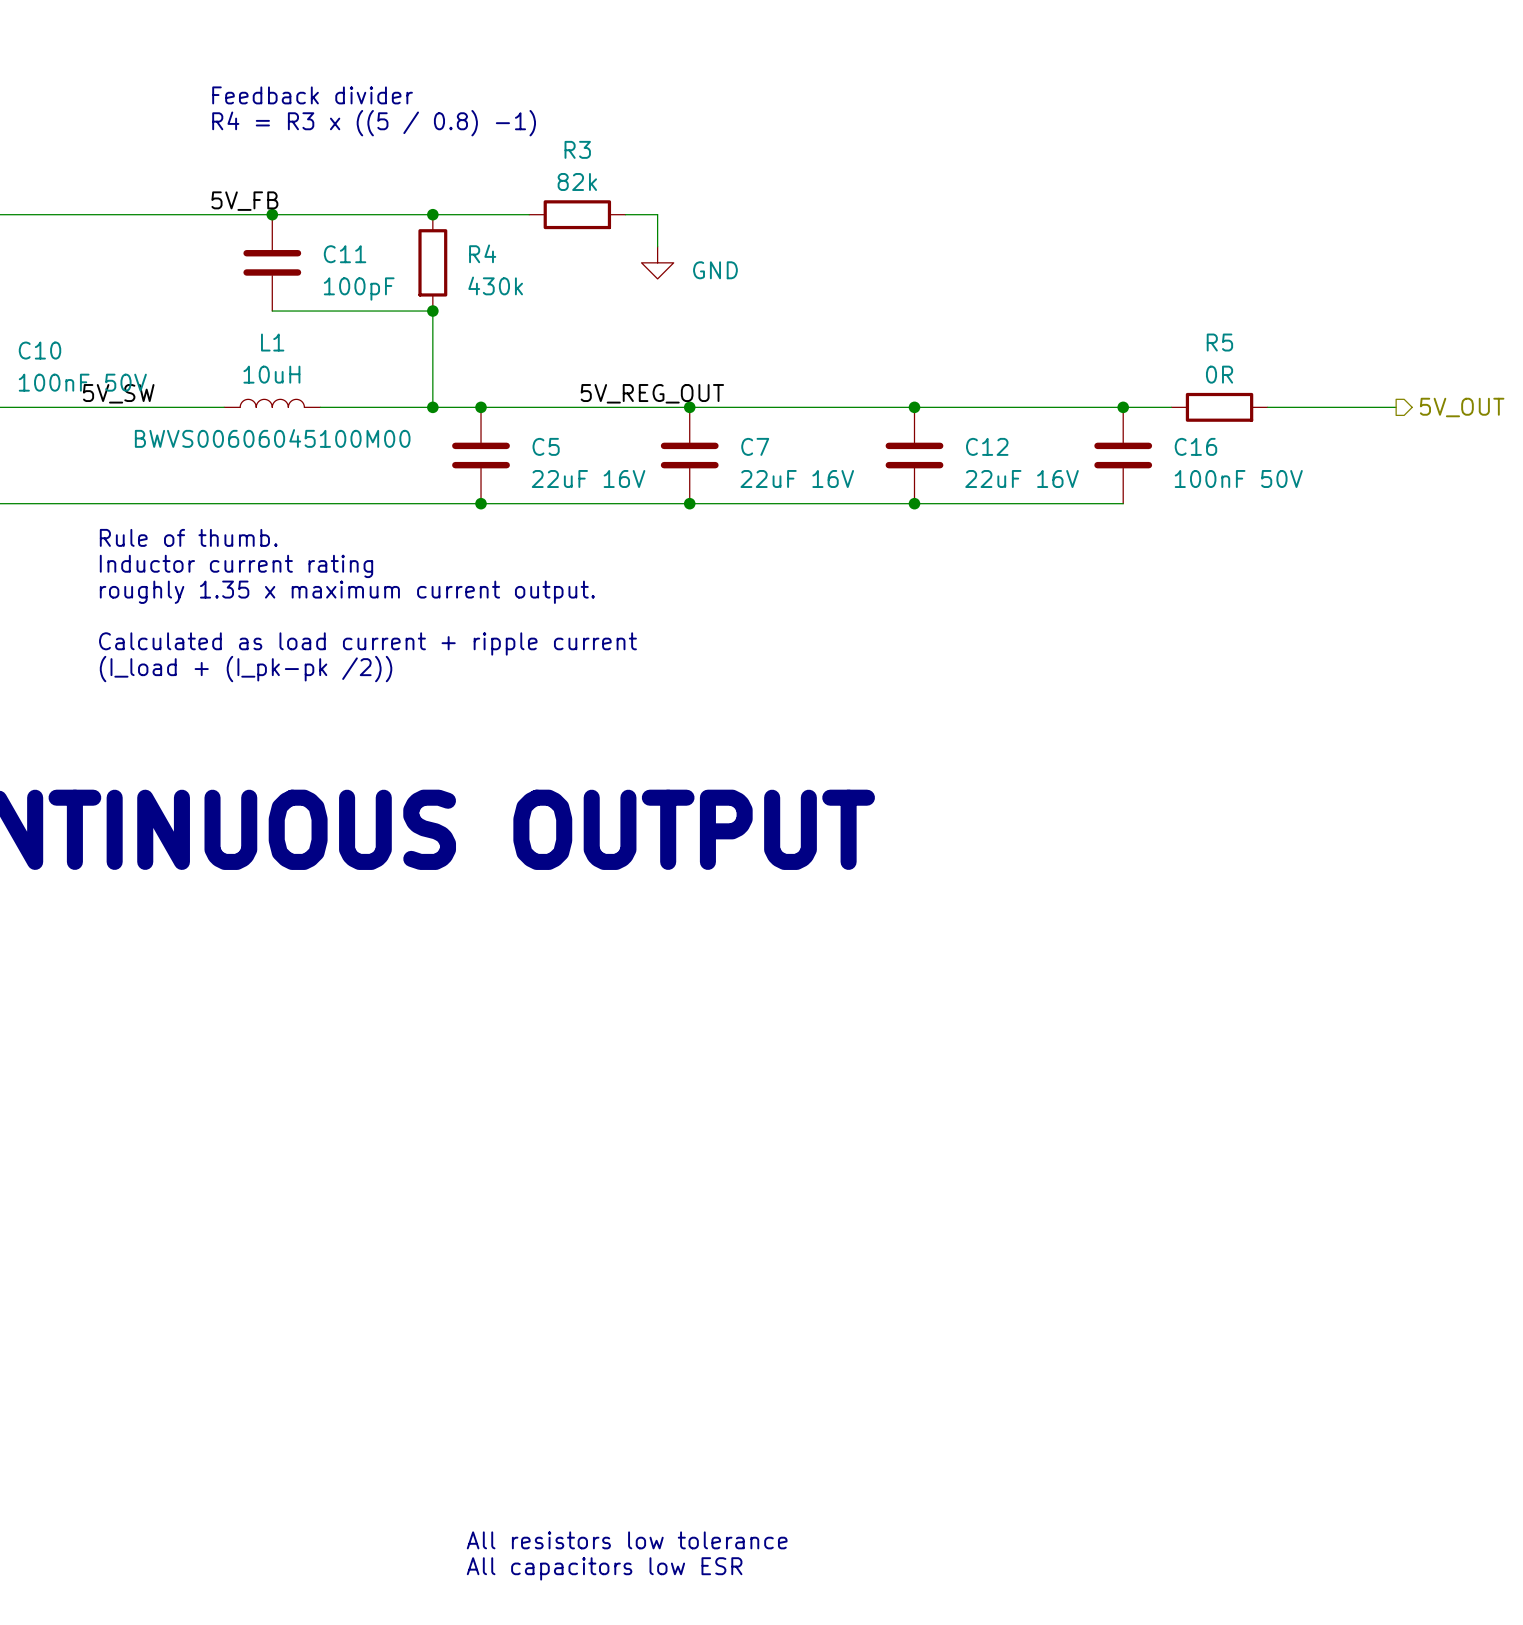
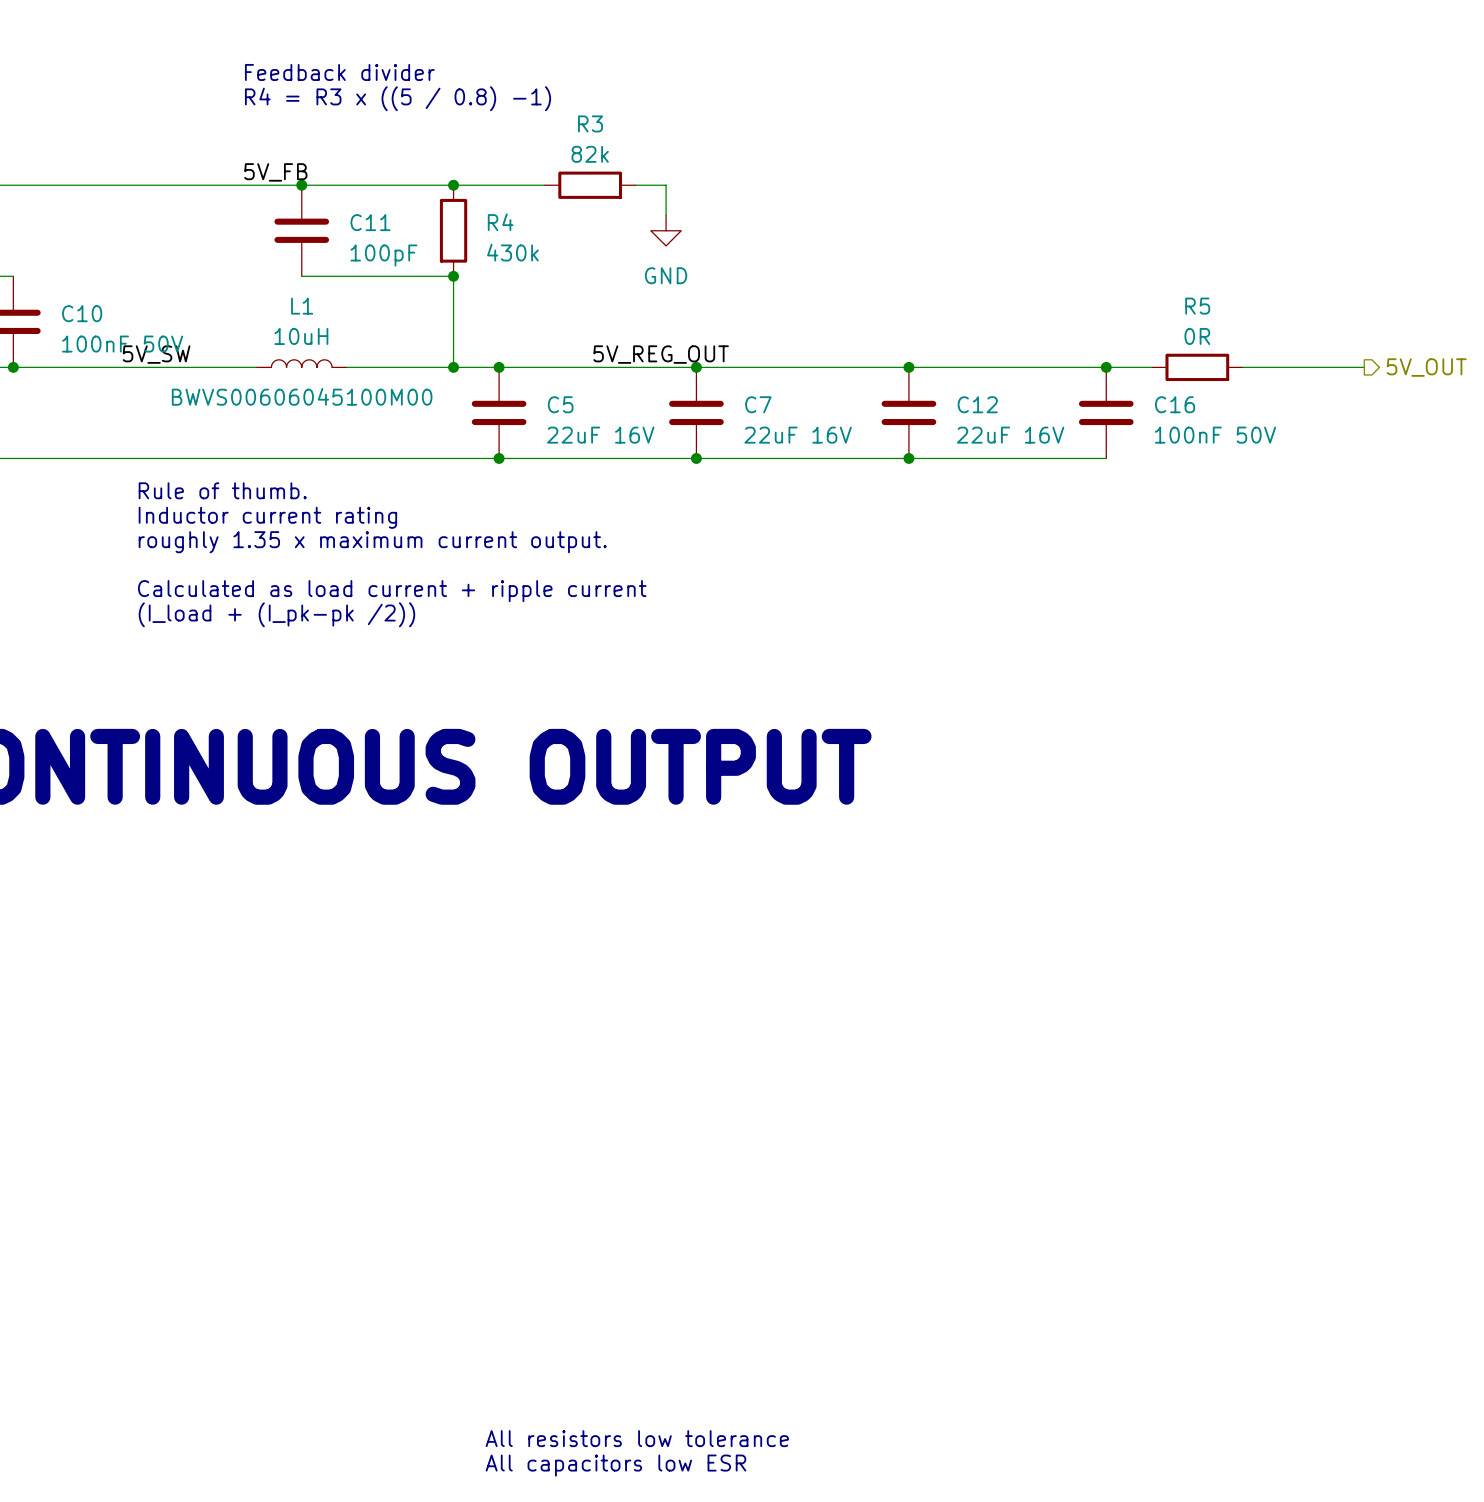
power symbol text position: GND (715, 270) -> GND (666, 275)

